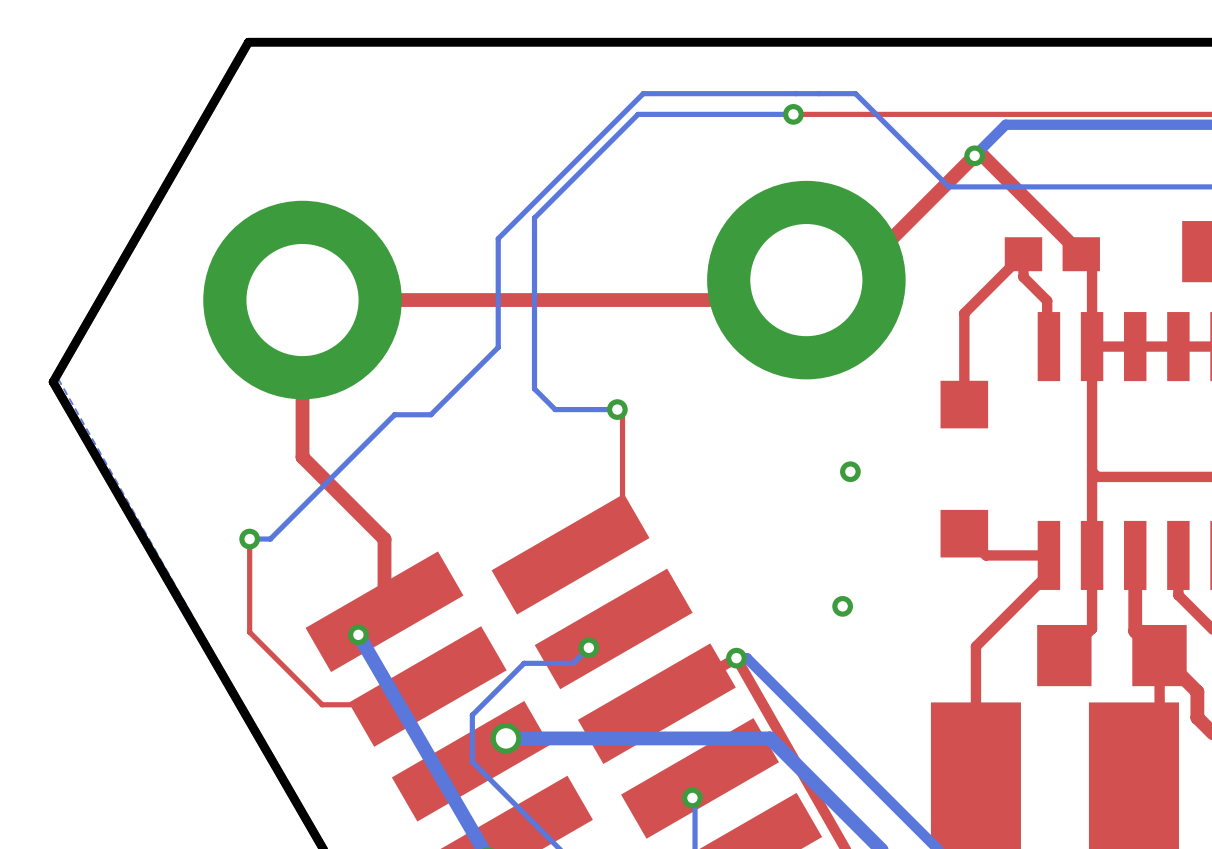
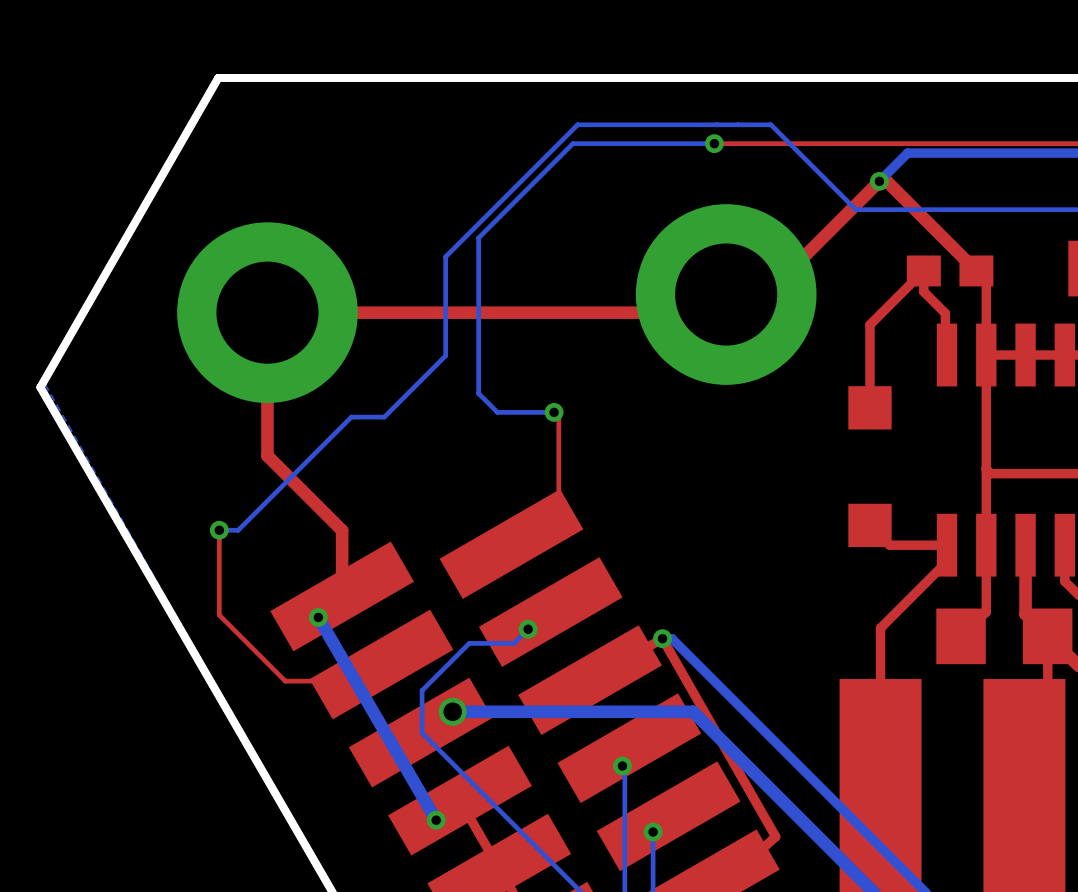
via: (850, 471) -> none
via: (842, 606) -> none

